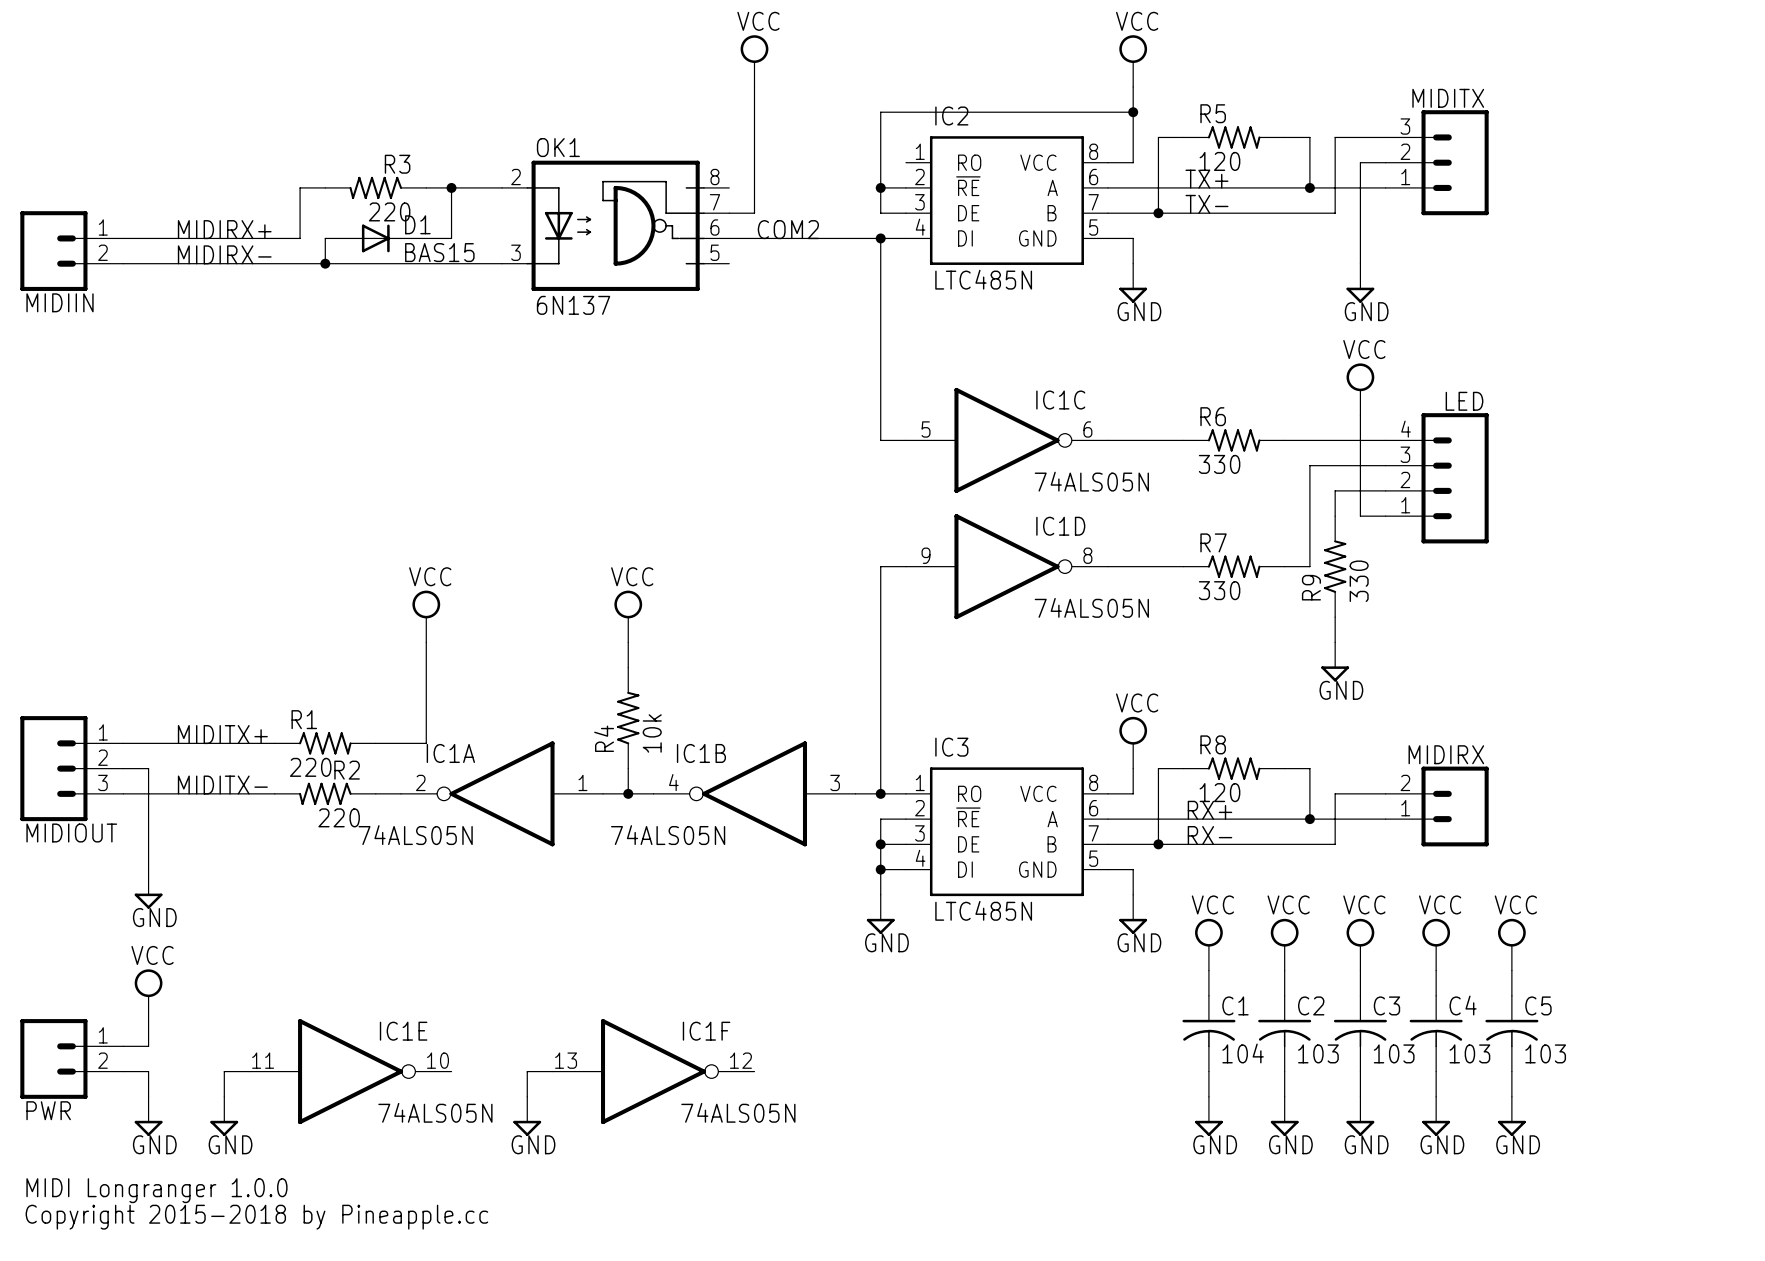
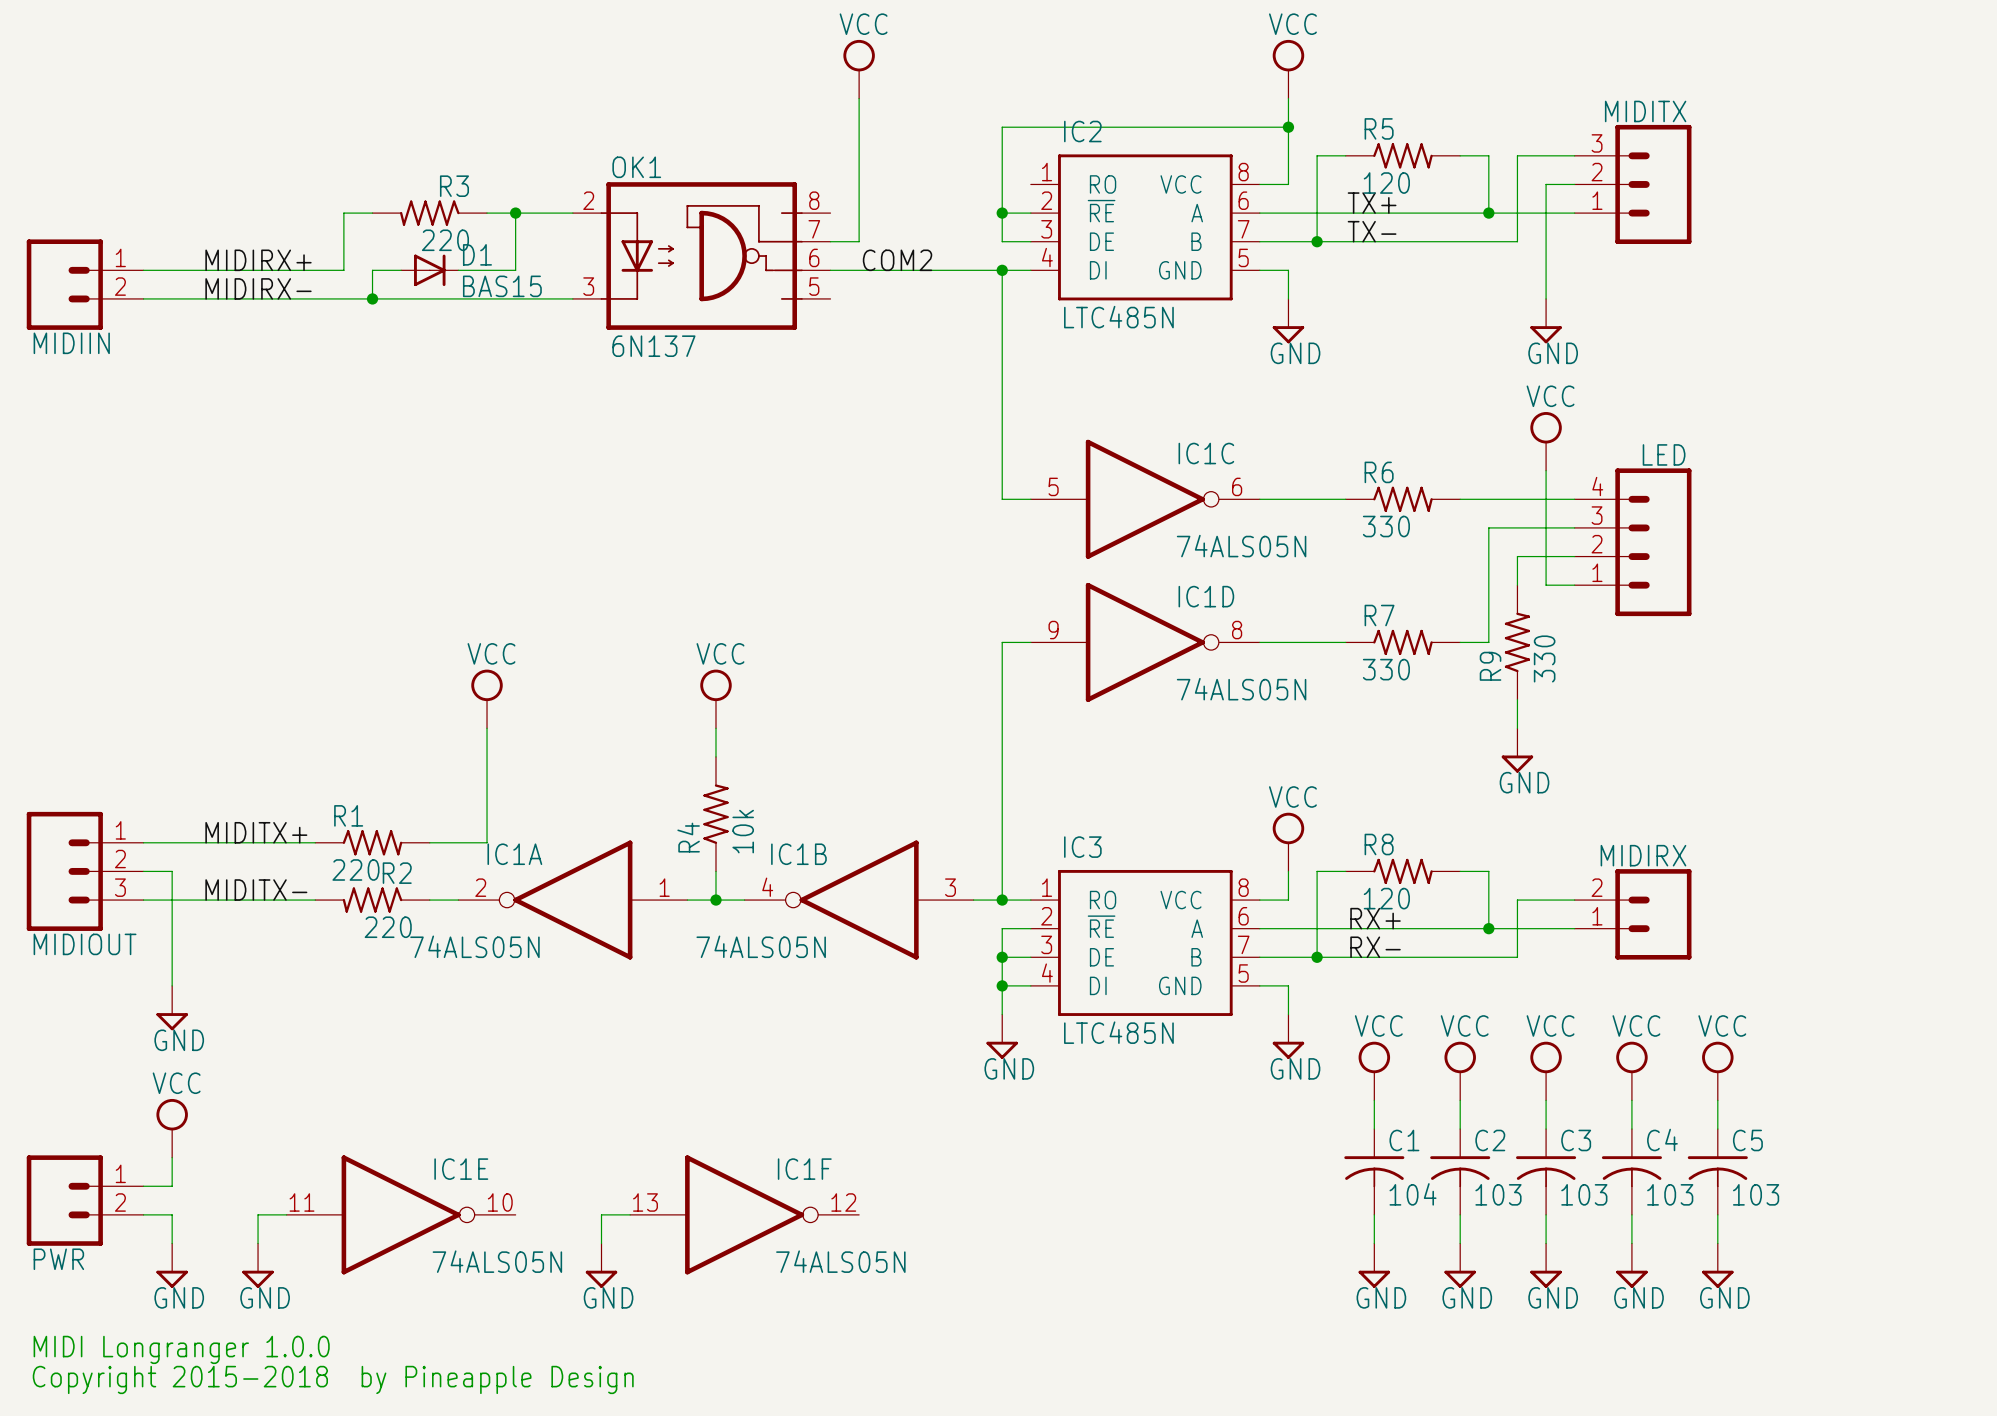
text: Copyright 2015-2018 by Pineapple.cc (256, 1217) -> Copyright 2015-2018 by Pineapple Design (333, 1379)

